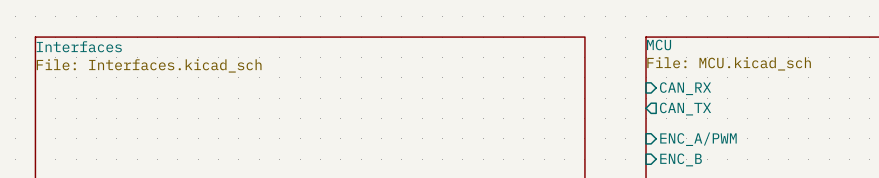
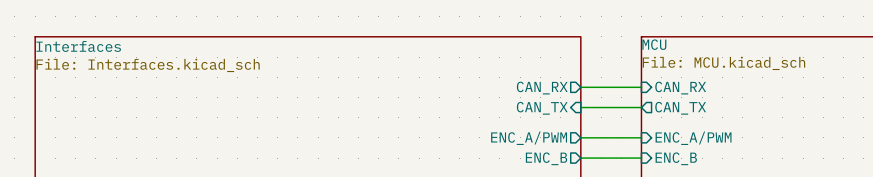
wire: none -> (580, 87) (641, 87)
sheet pin: none -> CAN_RX (542, 88)
wire: none -> (580, 107) (641, 107)
sheet pin: none -> CAN_TX (542, 108)
wire: none -> (580, 137) (641, 137)
sheet pin: none -> ENC_A/PWM (529, 138)
sheet pin: none -> ENC_B (546, 158)
wire: none -> (580, 158) (641, 158)

